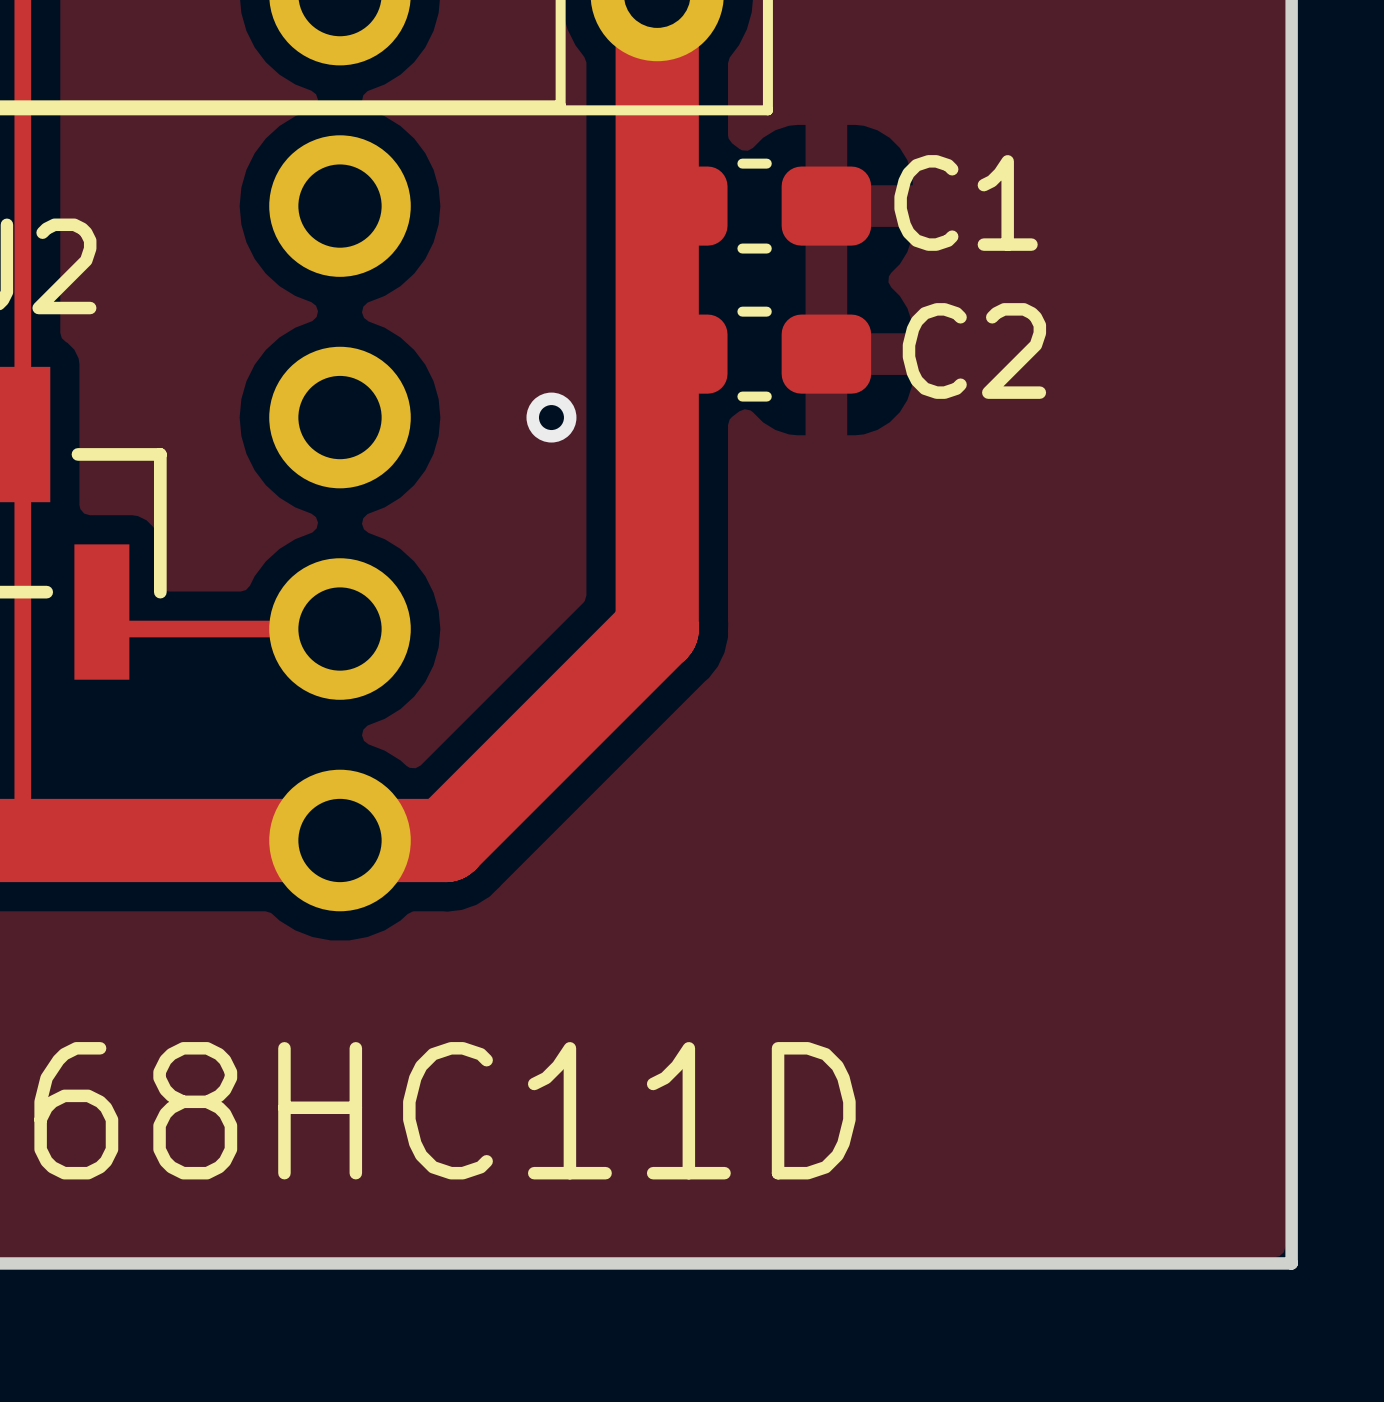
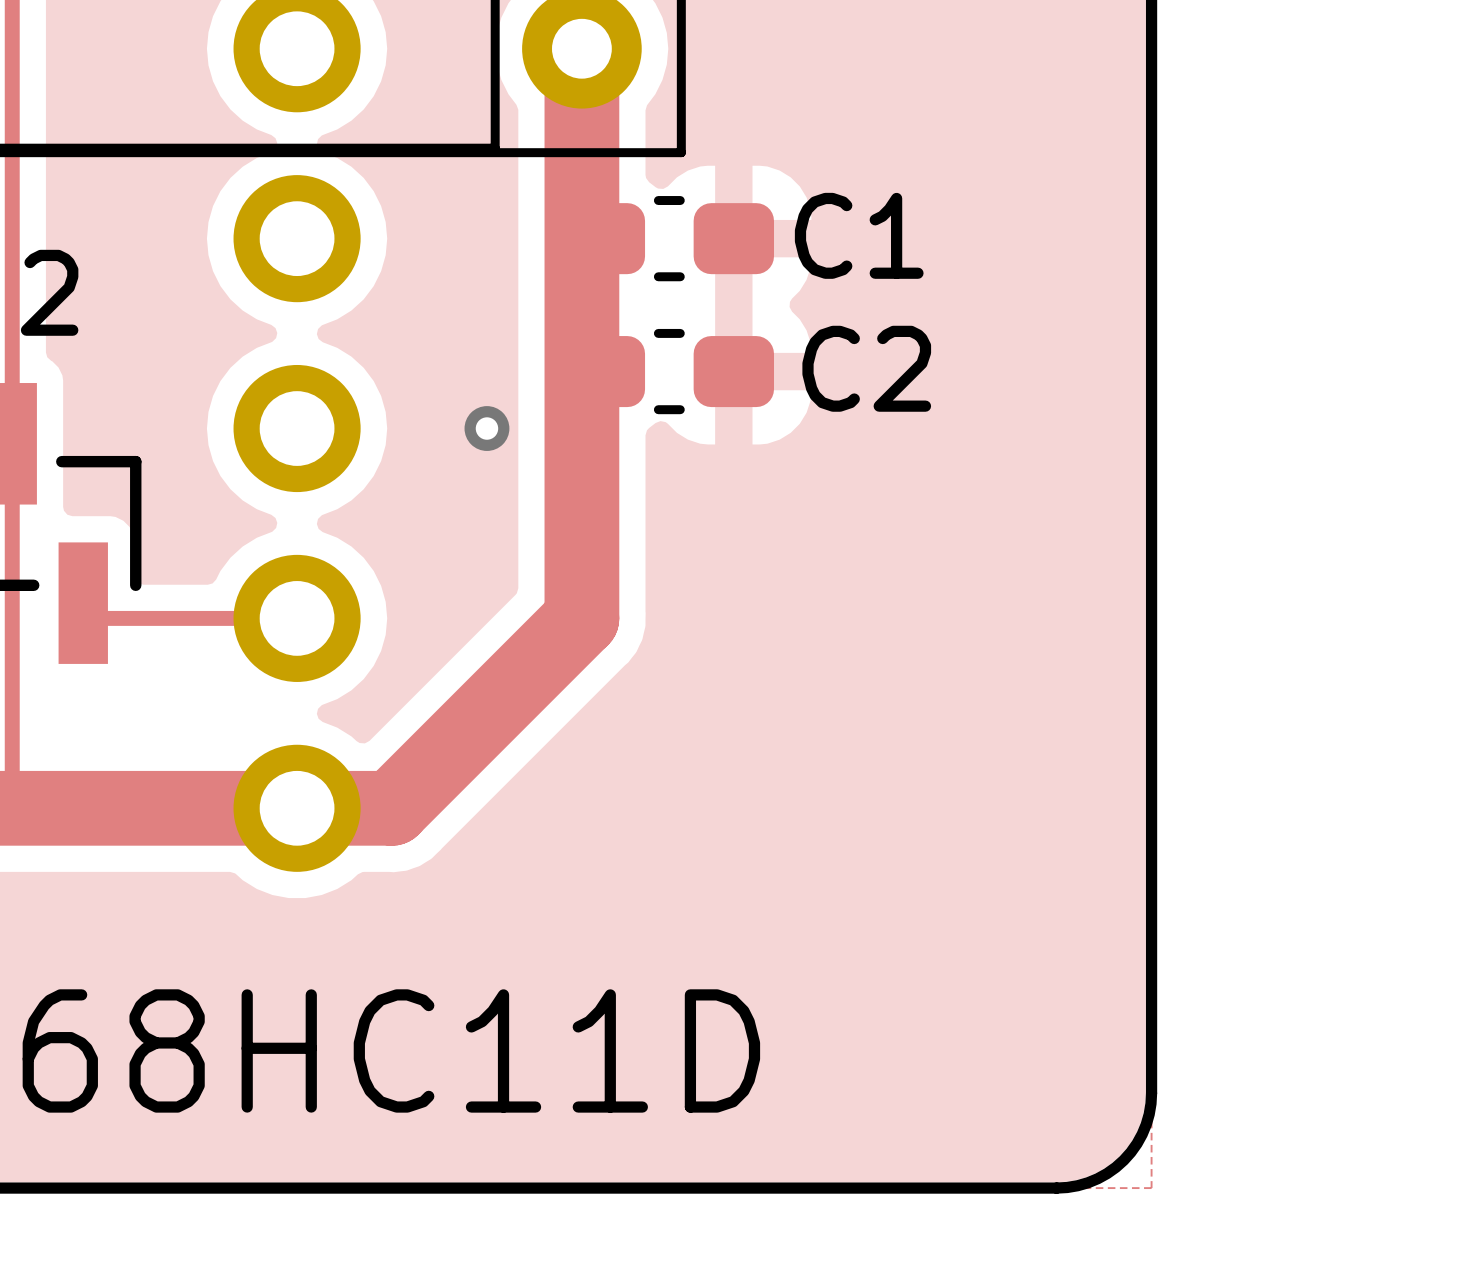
board edge: (1291, 1157) (1291, 1263) (1185, 1263) -> (1151, 1093) (1149, 1114) (1142, 1134) (1123, 1160) (1107, 1173) (1087, 1182) (1056, 1188)

